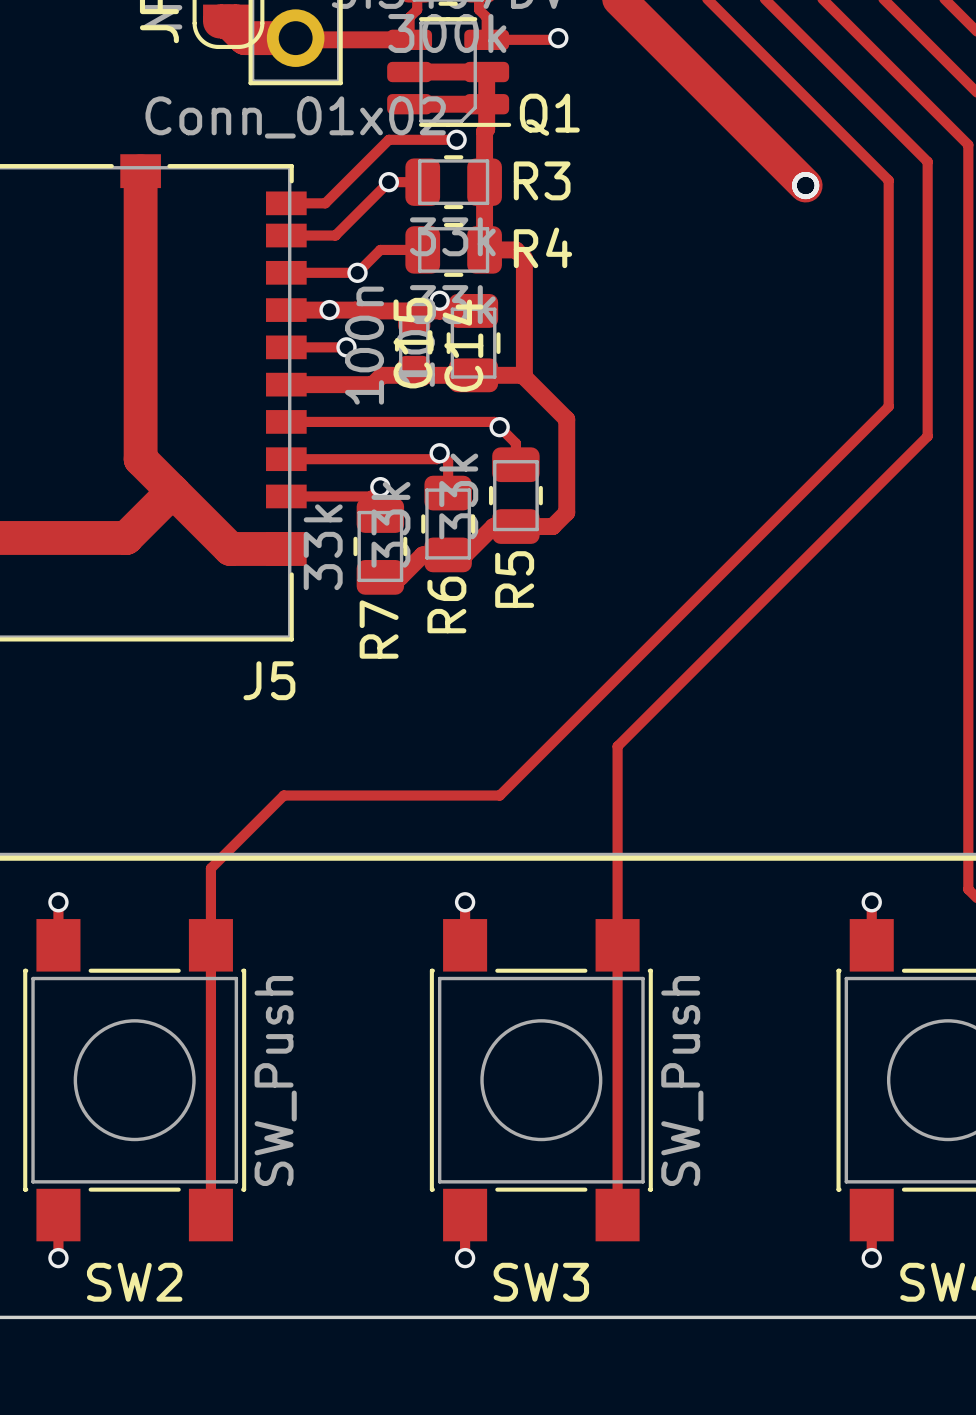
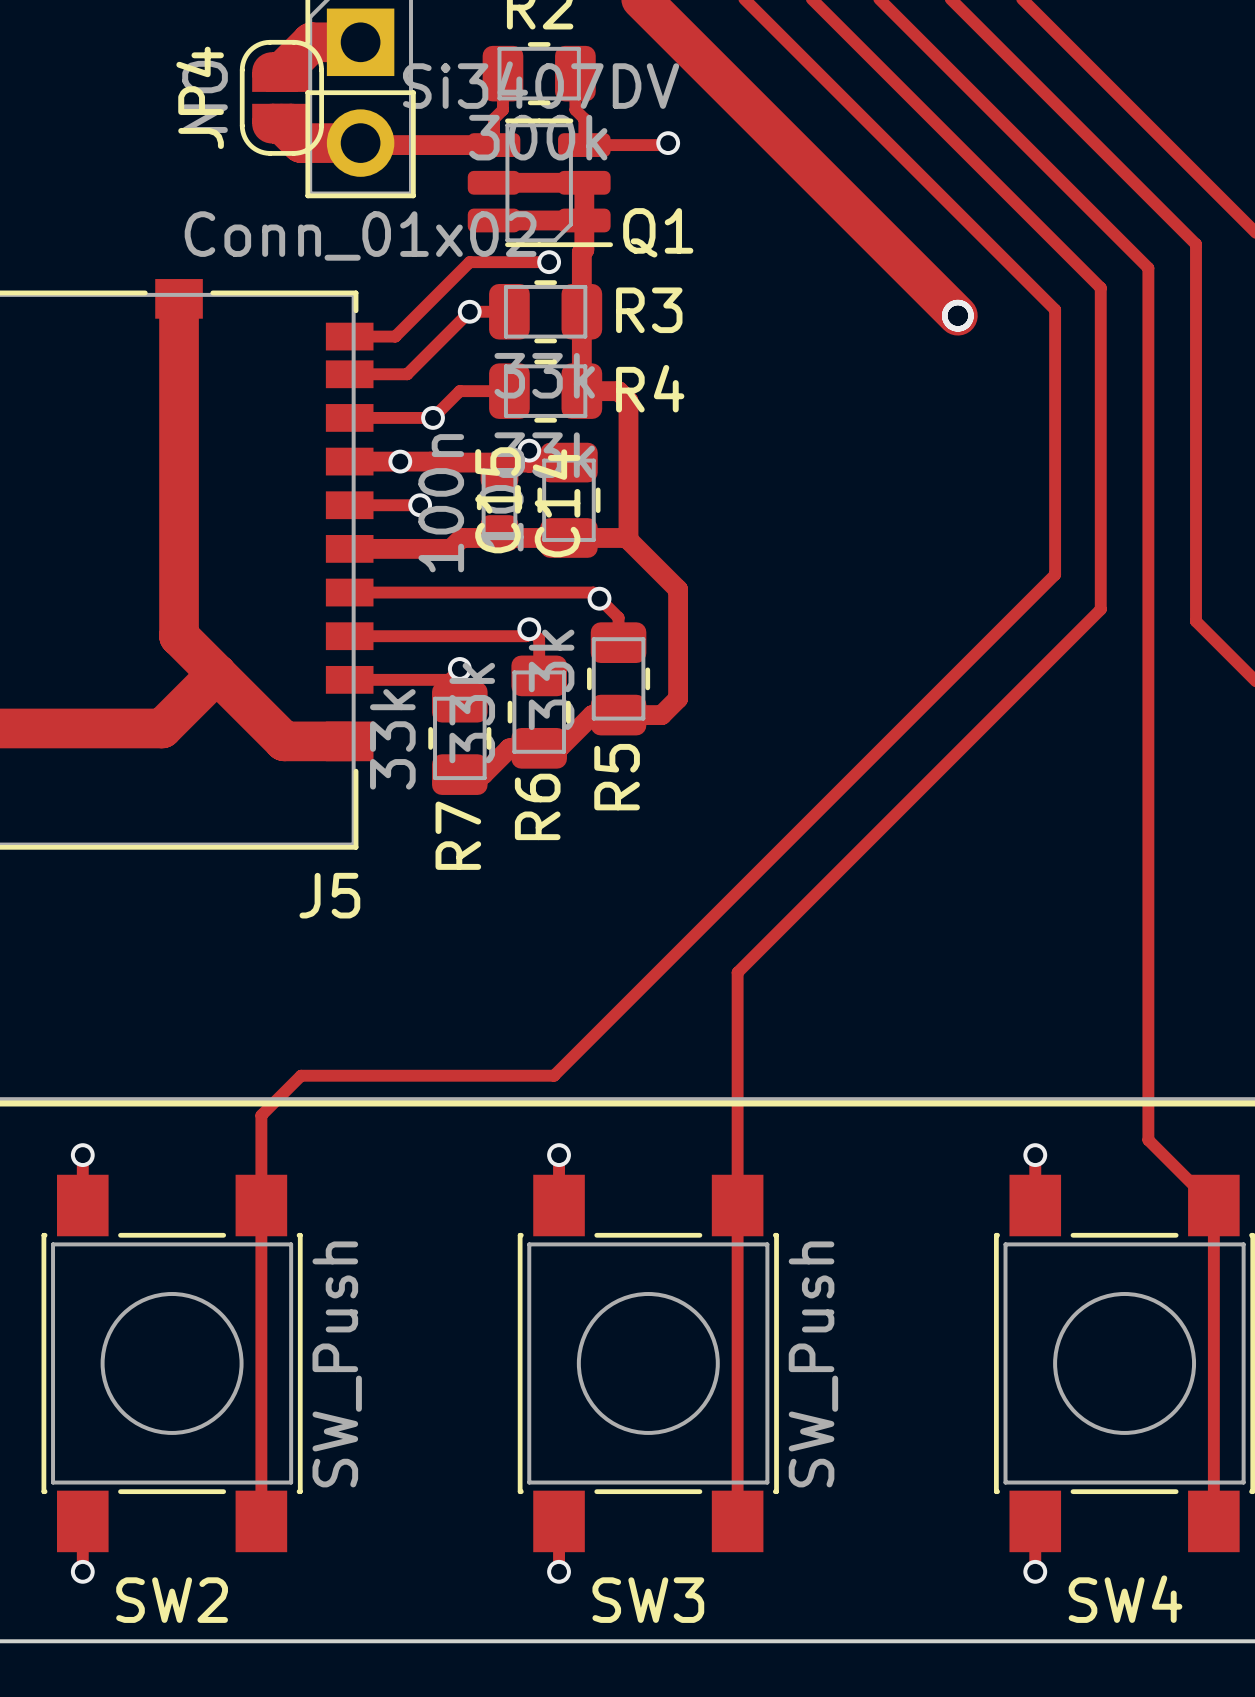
track: (499, 795) (283, 795) (244, 834) -> (599, 1030) (554, 1075) (301, 1075)

